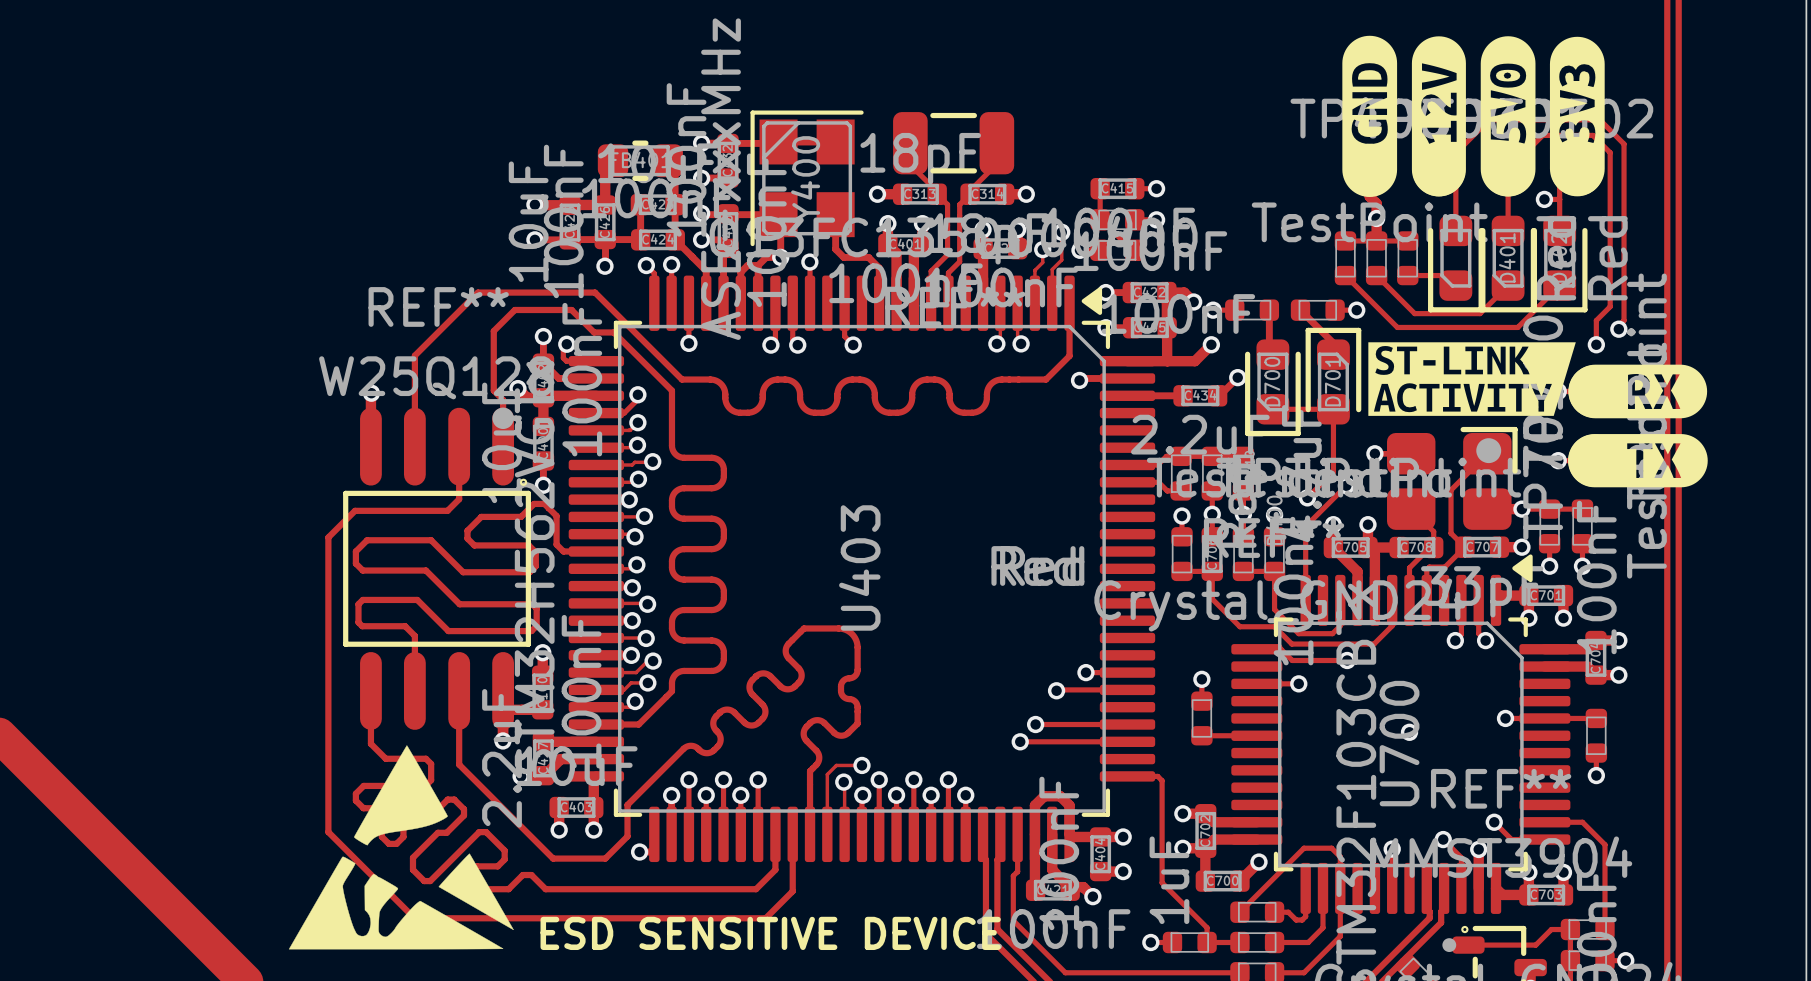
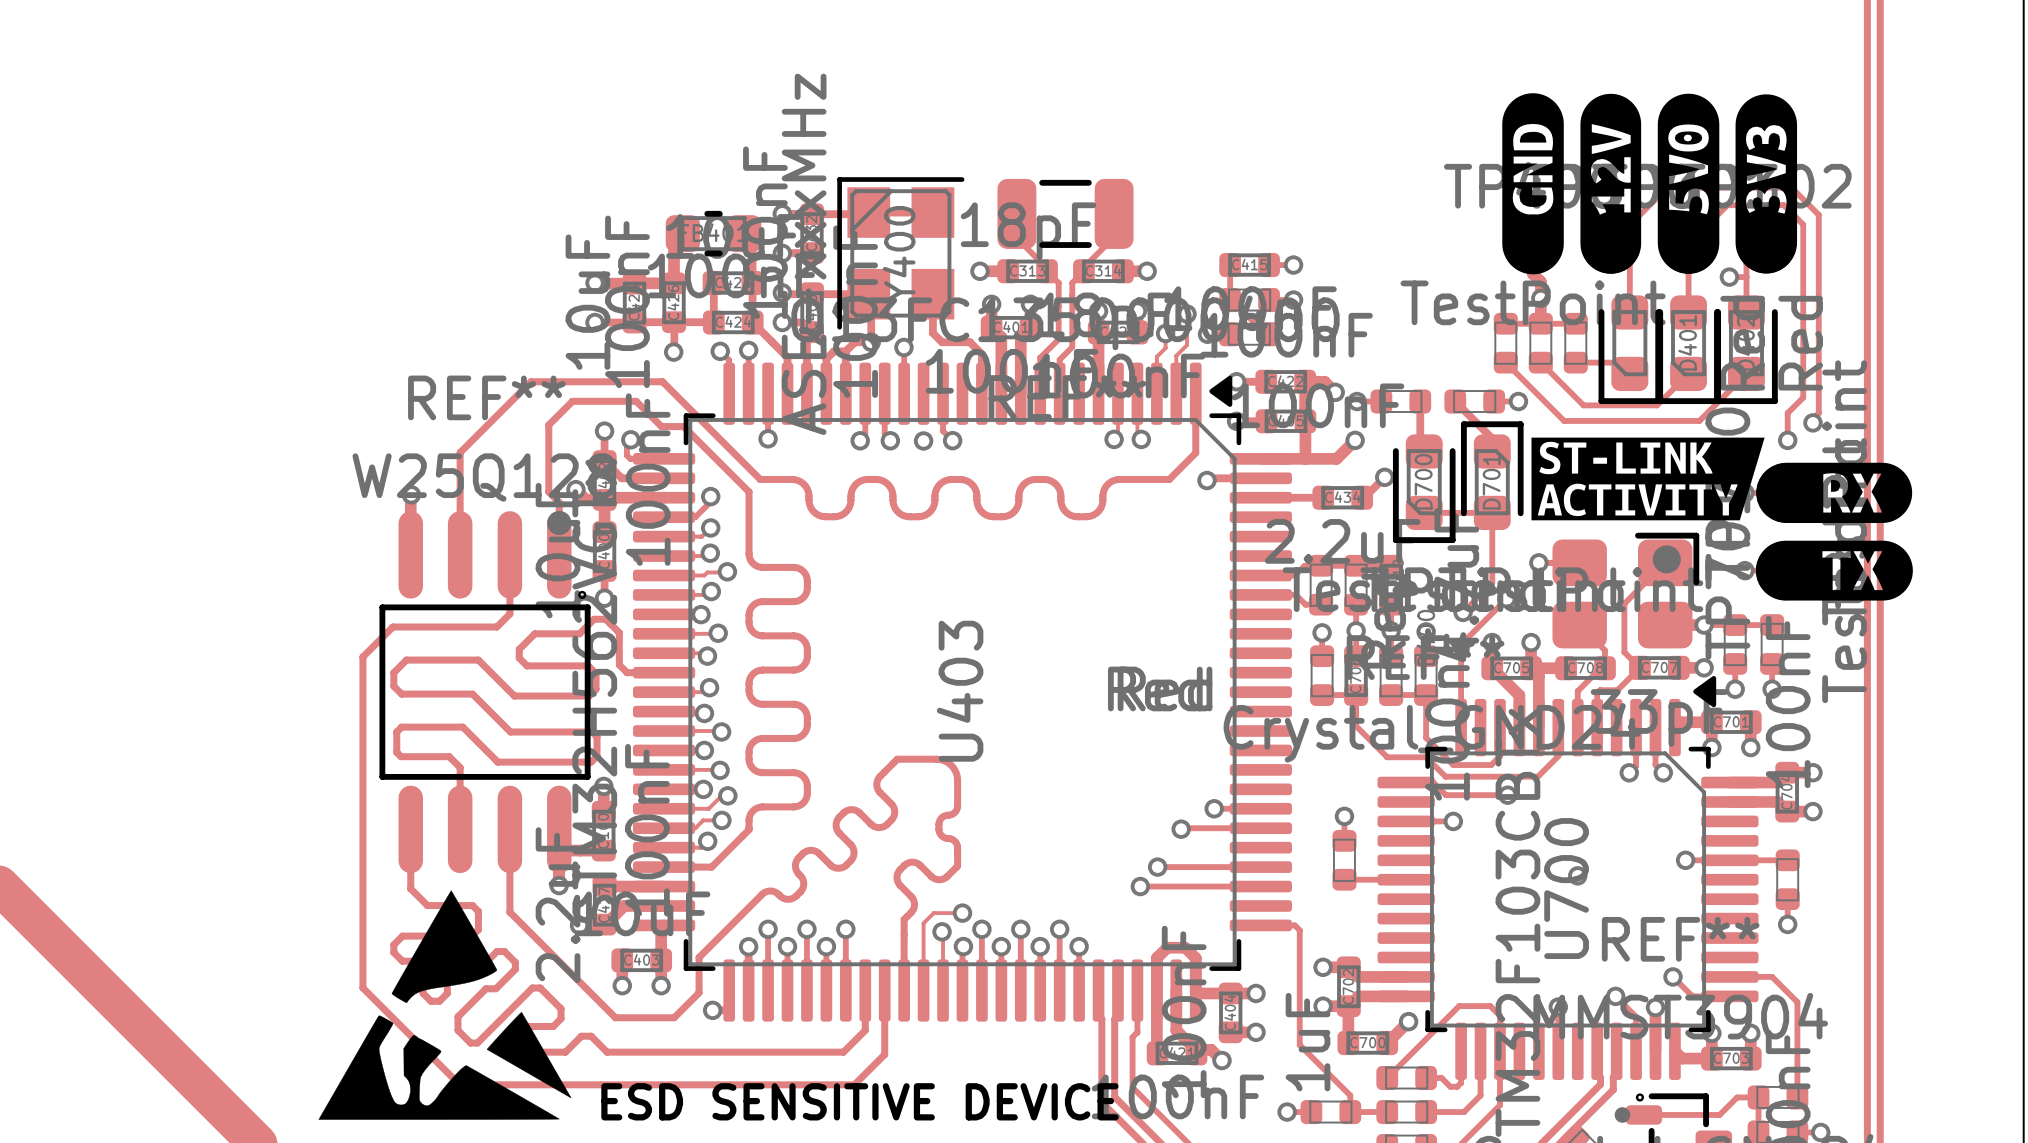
via: none -> (923, 440)

